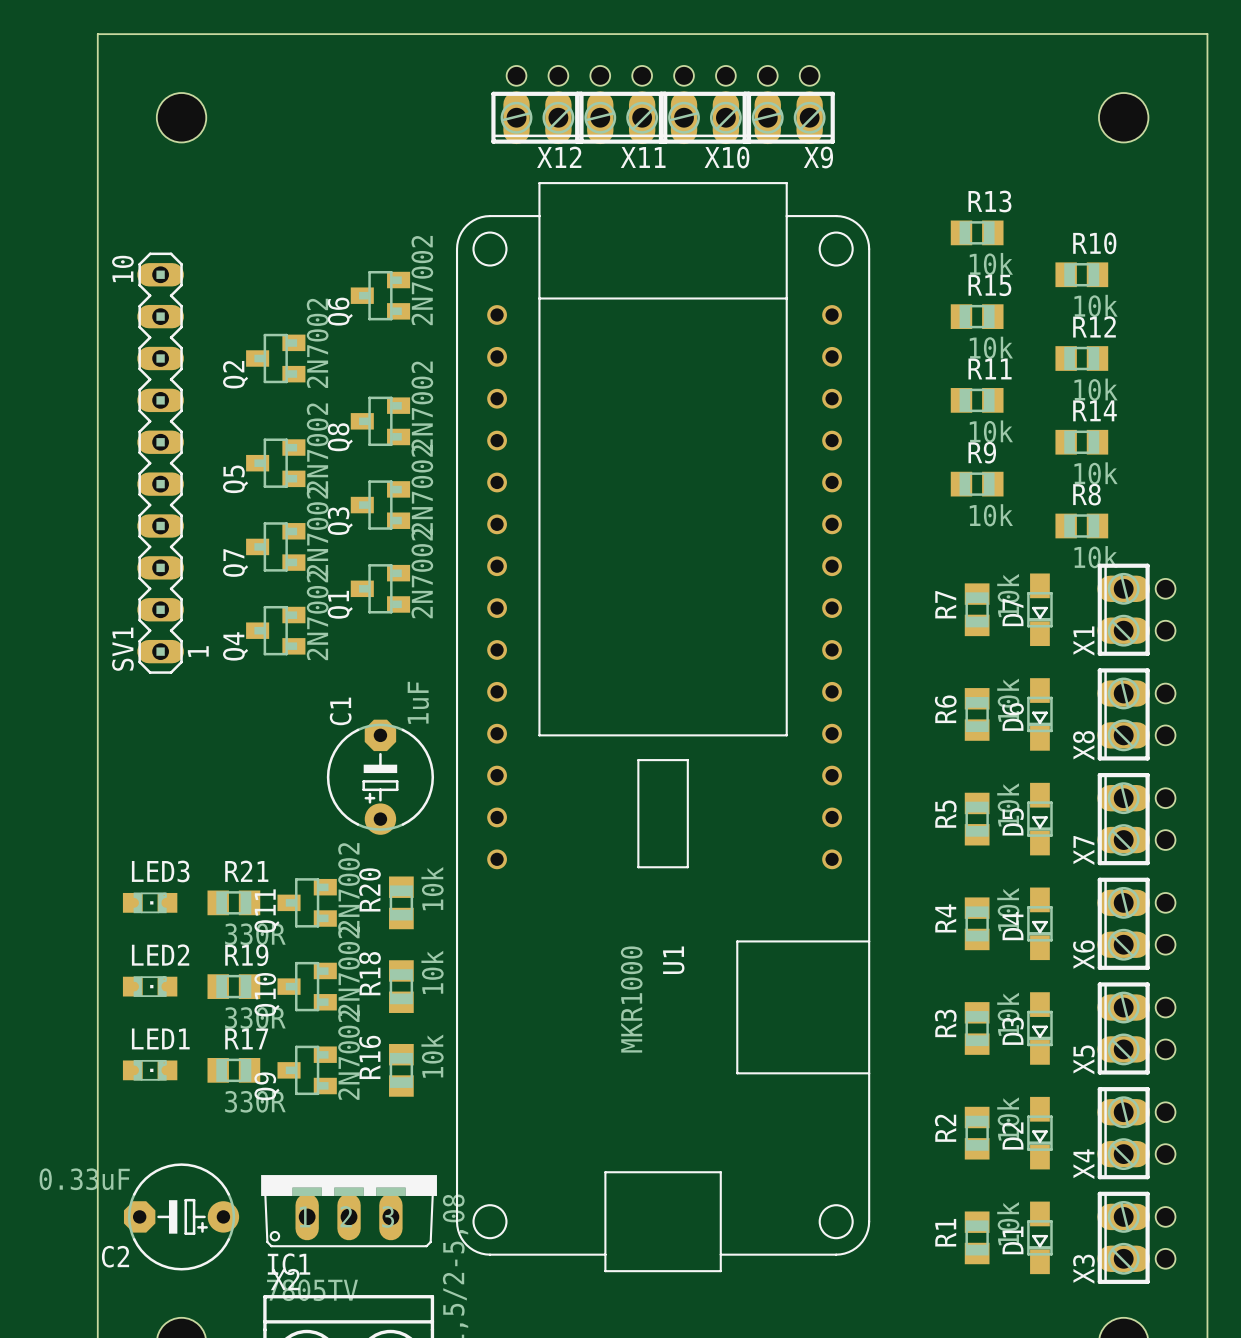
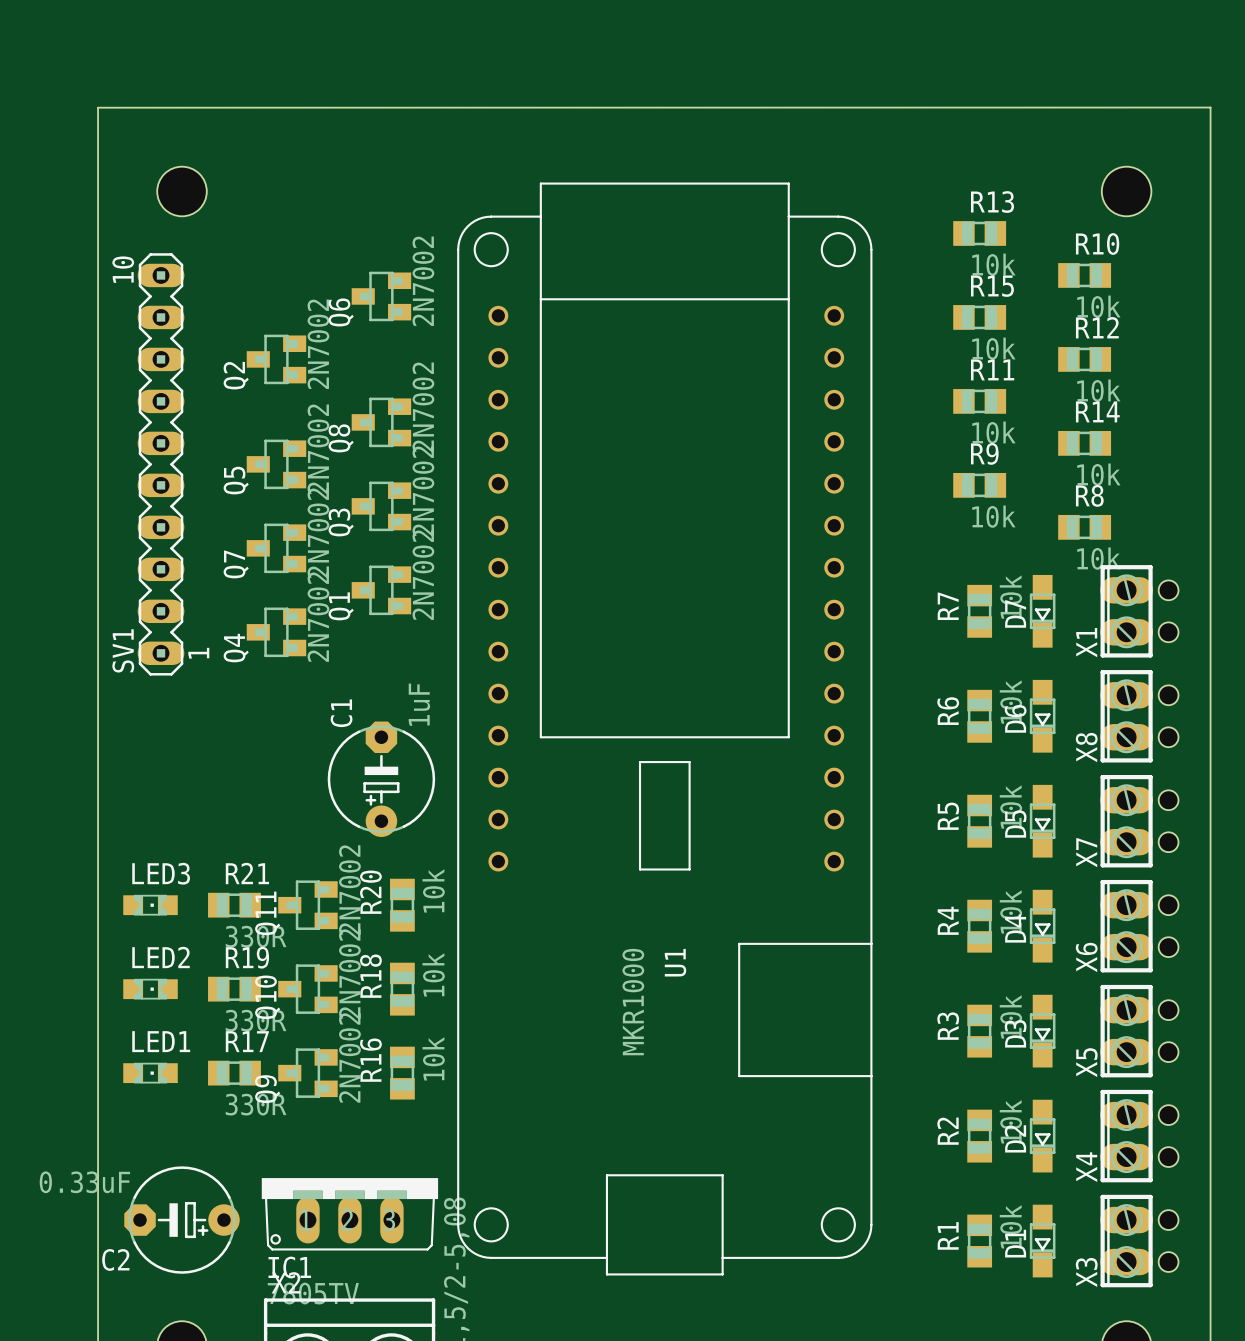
hole: (516, 75) -> none
hole: (558, 75) -> none
hole: (600, 75) -> none
hole: (642, 75) -> none
hole: (684, 75) -> none
hole: (725, 75) -> none
hole: (767, 75) -> none
hole: (809, 75) -> none
board edge: (1207, 107) (1207, 33) (97, 34) (97, 107) -> (1210, 107) (98, 107)
hole position: (181, 117) -> (182, 191)
X12: (537, 117) -> none
X11: (621, 117) -> none
X10: (704, 117) -> none
X9: (788, 117) -> none
hole position: (1123, 117) -> (1126, 191)

